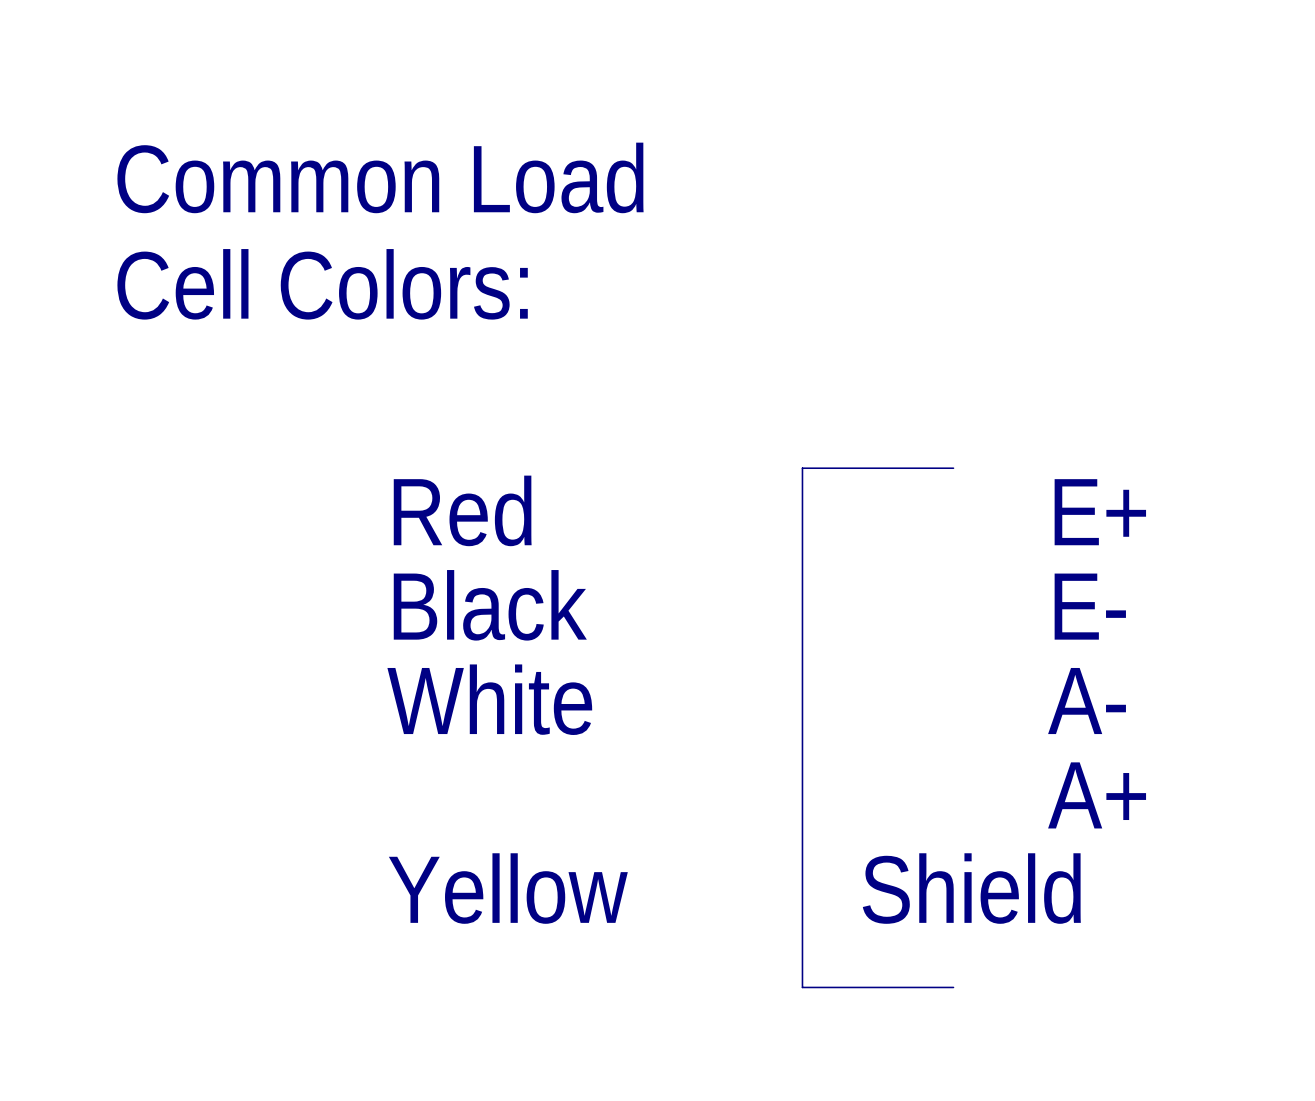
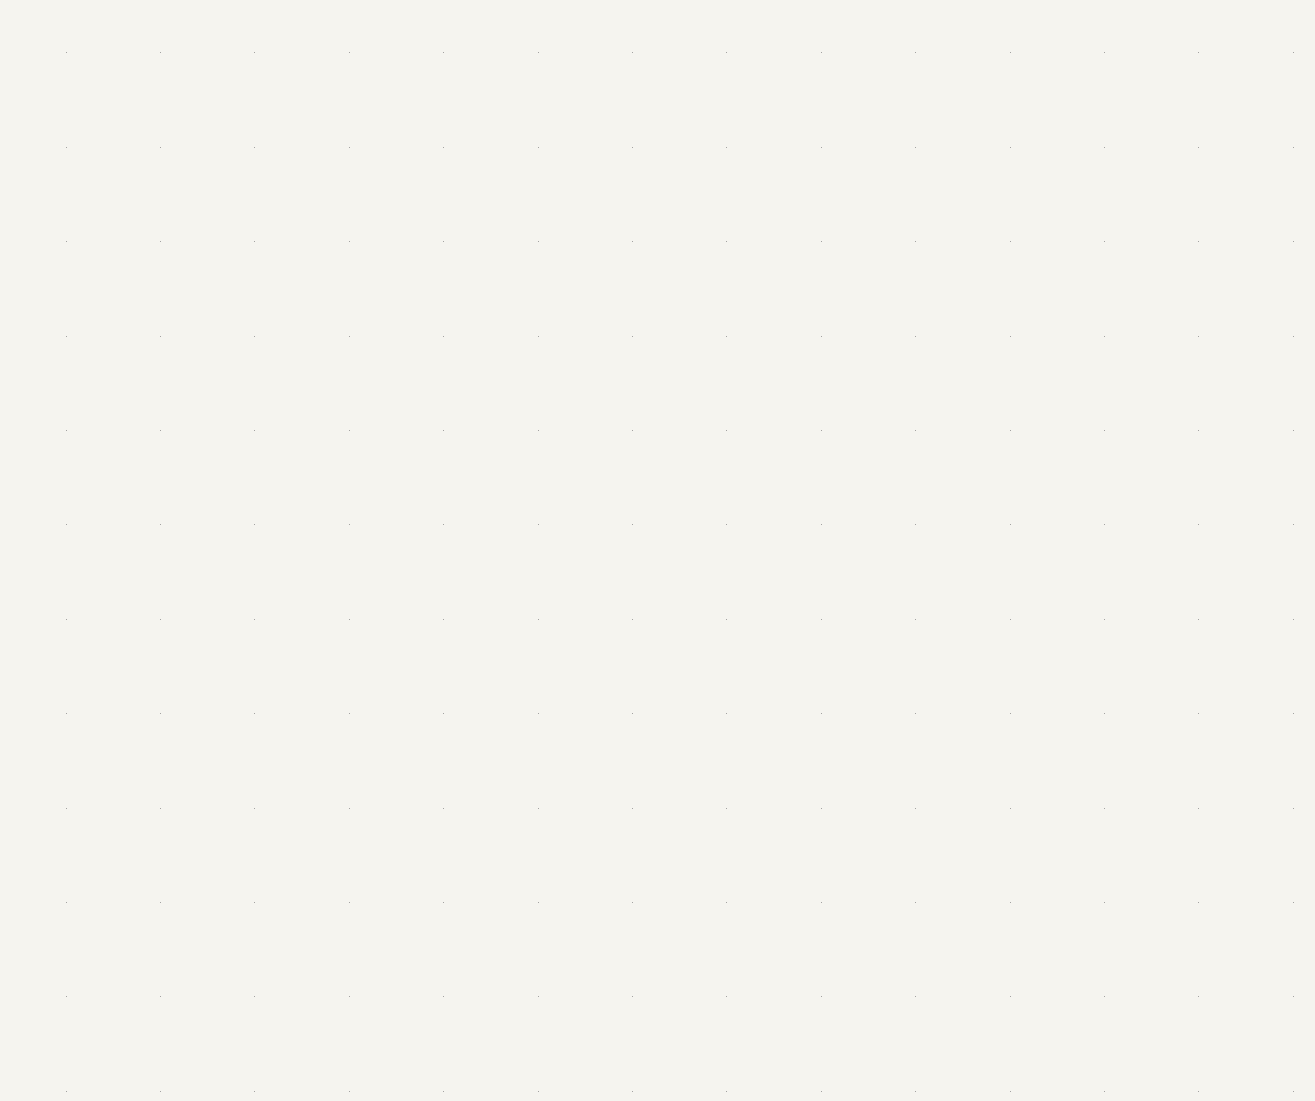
text: Common Load (380, 177) -> none
text: Cell Colors: (322, 284) -> none
line: (953, 468) (802, 468) (802, 987) (953, 987) -> none
text: Red (462, 510) -> none
text: E+ (1100, 512) -> none
text: Black (490, 605) -> none
text: E- (1090, 606) -> none
text: White (489, 699) -> none
text: A- (1087, 701) -> none
text: A+ (1097, 795) -> none
text: Yellow (508, 888) -> none
text: Shield (971, 888) -> none

